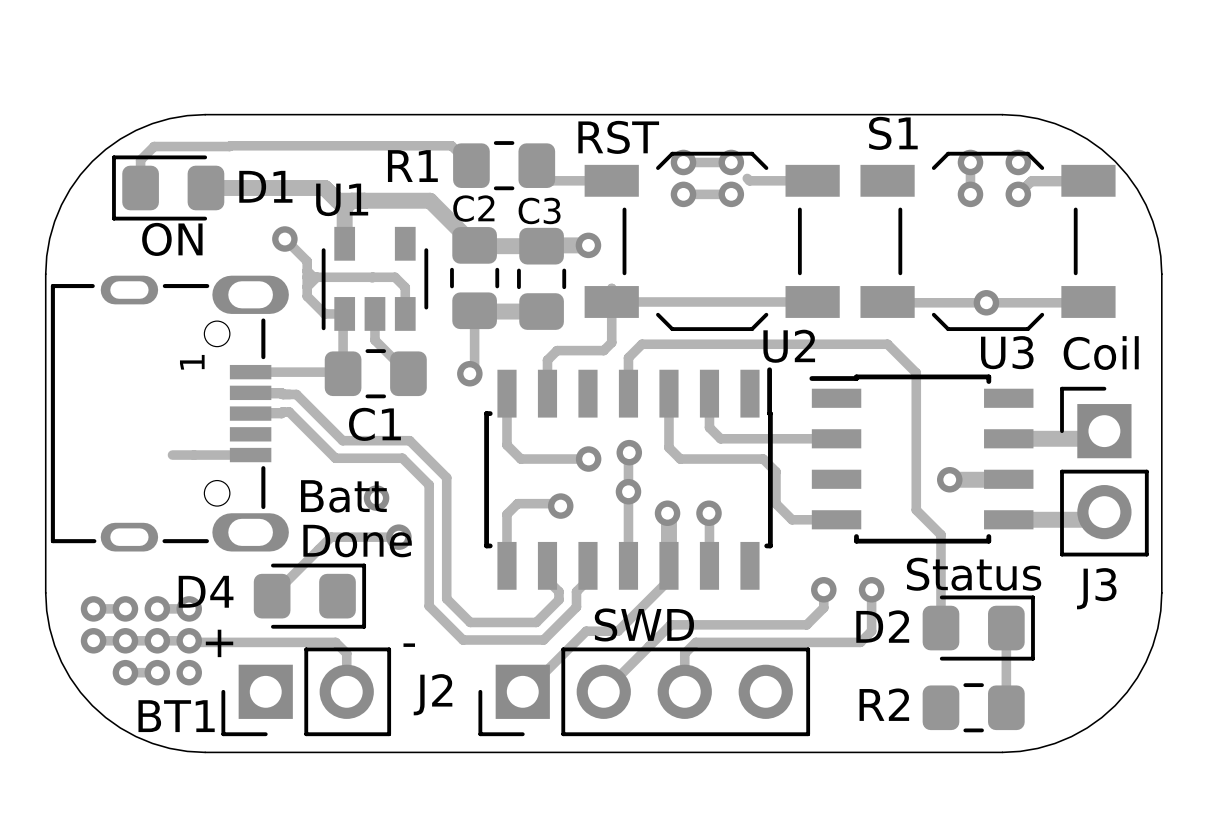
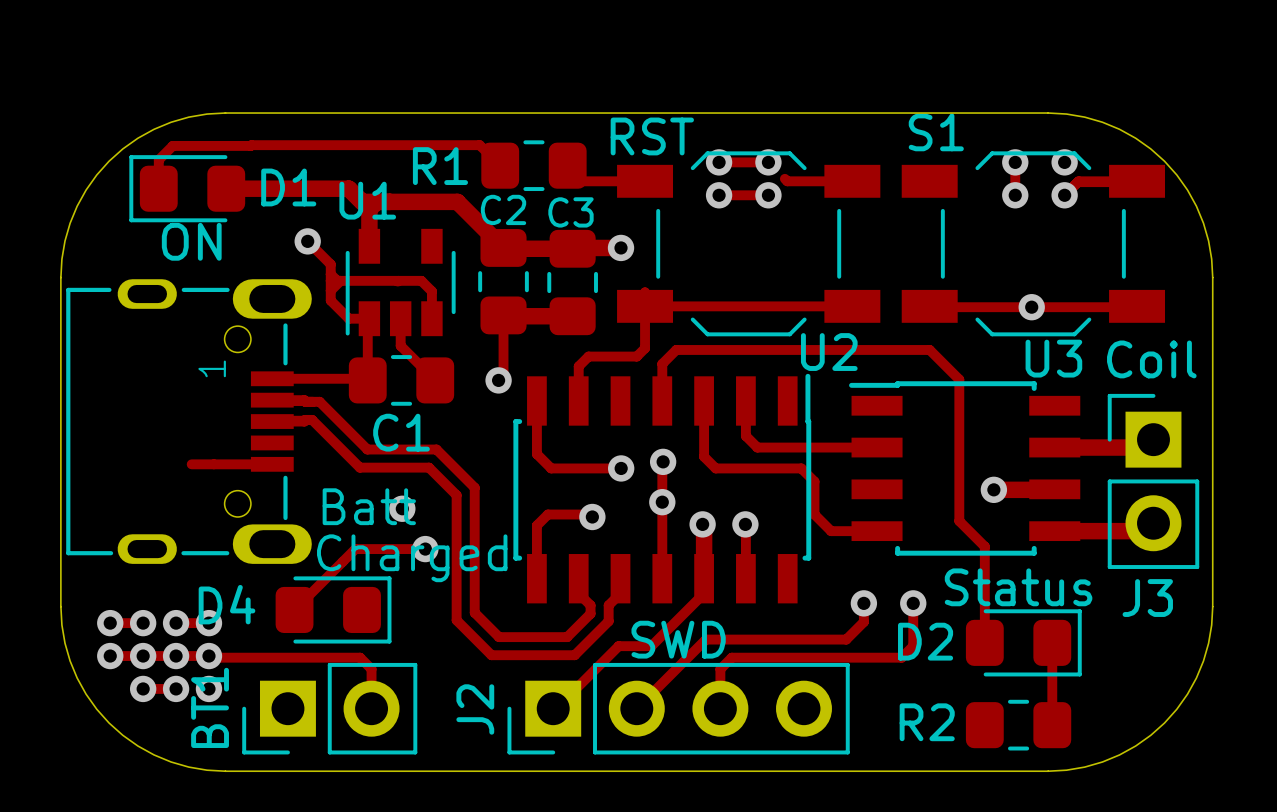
text: Done (357, 541) -> Charged (412, 558)
text: + (219, 643) -> none
text: - (409, 645) -> none
J2 name rotation: 0° (433, 694) -> 90° counterclockwise (475, 709)
BT1 name rotation: 0° (176, 716) -> 90° counterclockwise (210, 707)

